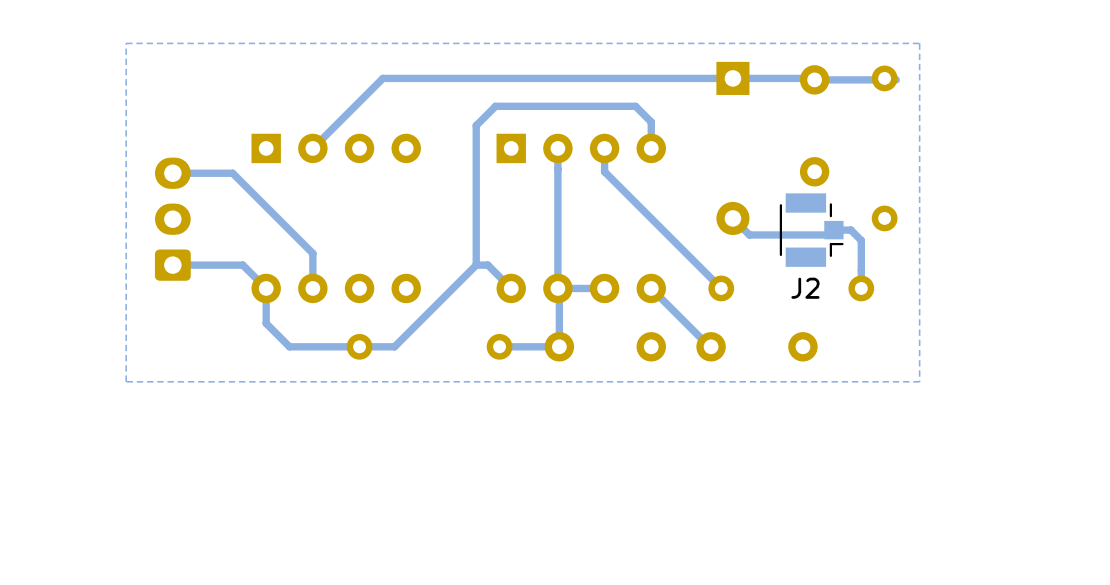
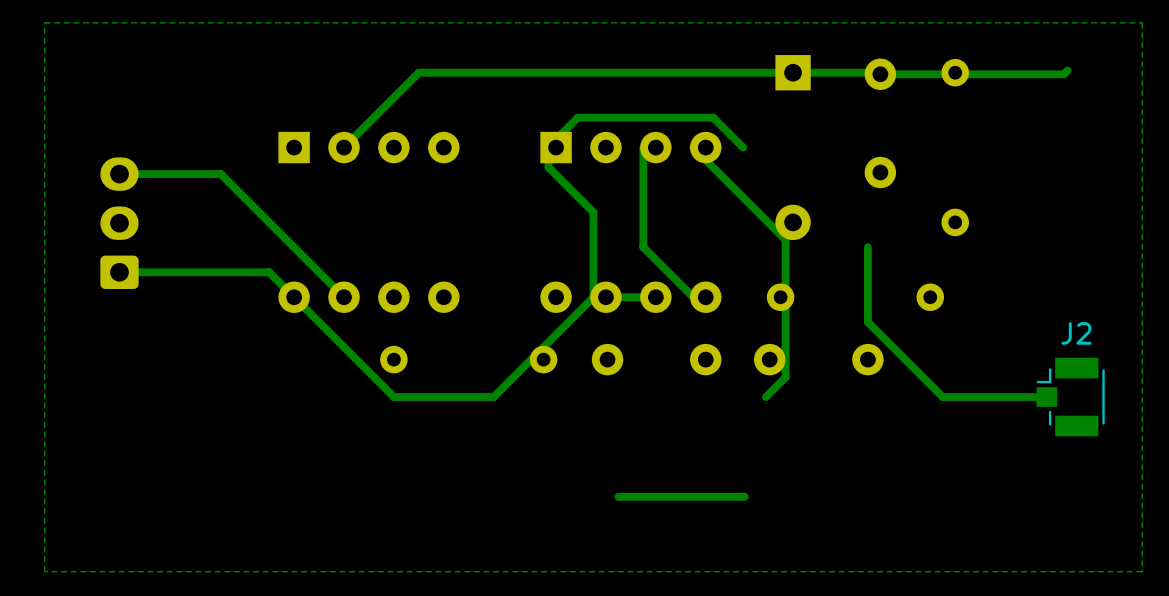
bottom zone outline: (919, 43) (126, 43) (126, 381) (919, 381) (919, 43) -> (1142, 22) (1142, 571) (44, 571) (44, 22) (1142, 22)
bottom track: none -> (1067, 70) (1063, 74) (967, 74)
bottom track: (557, 148) (559, 346) (499, 346) -> none
bottom track: none -> (643, 147) (643, 247) (693, 297)
bottom track: (604, 148) (604, 171) (721, 288) -> none
bottom track: none -> (693, 147) (785, 239) (785, 377) (765, 397)
bottom track: (651, 148) (651, 122) (635, 106) (495, 106) (476, 125) (476, 265) -> none
bottom track: none -> (194, 174) (119, 174)
bottom track: (197, 173) (232, 173) (312, 253) (312, 288) -> (220, 174) (344, 297)
bottom track: (732, 218) (749, 234) (829, 234) (833, 230) (850, 230) (861, 240) (861, 288) -> none
part position: (172, 219) -> (119, 223)
J2 rotation: 0° (811, 230) -> 180° (1070, 397)
J2 position: (811, 230) -> (1070, 397)
bottom track: none -> (867, 247) (867, 322) (942, 397) (1046, 397)
bottom track: none -> (194, 272) (119, 272)
bottom track: (476, 265) (394, 346) (289, 346) (266, 323) (266, 288) -> (743, 147) (713, 117) (577, 117) (548, 146) (548, 167) (593, 212) (593, 297) (493, 397) (393, 397) (294, 297)
bottom track: (476, 265) (487, 265) (511, 288) -> none
bottom track: (651, 288) (711, 346) -> none
bottom track: none -> (744, 496) (618, 496)

